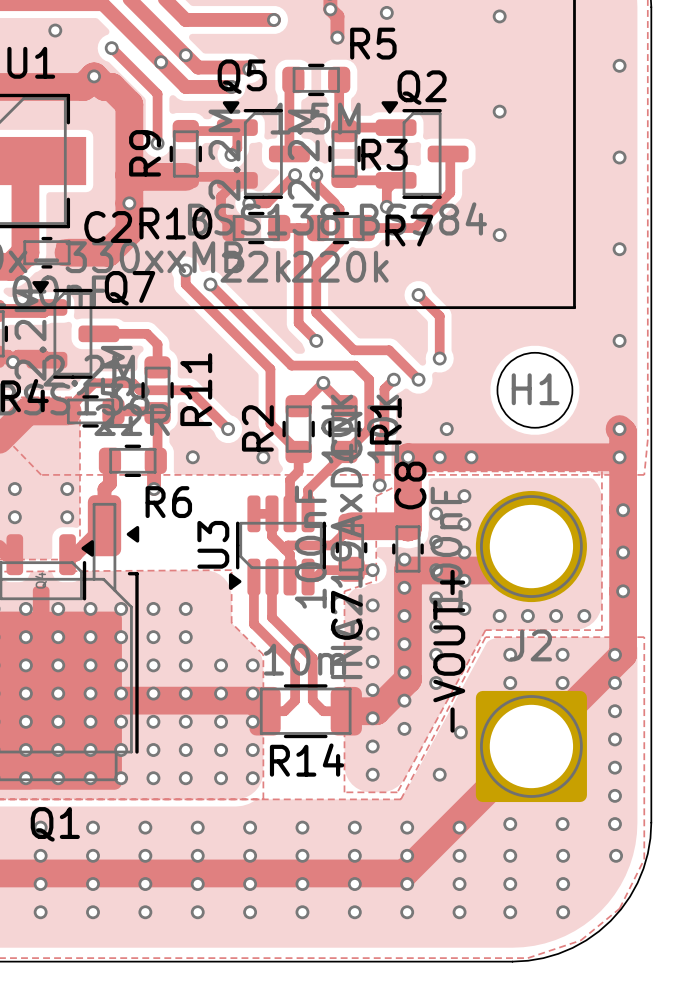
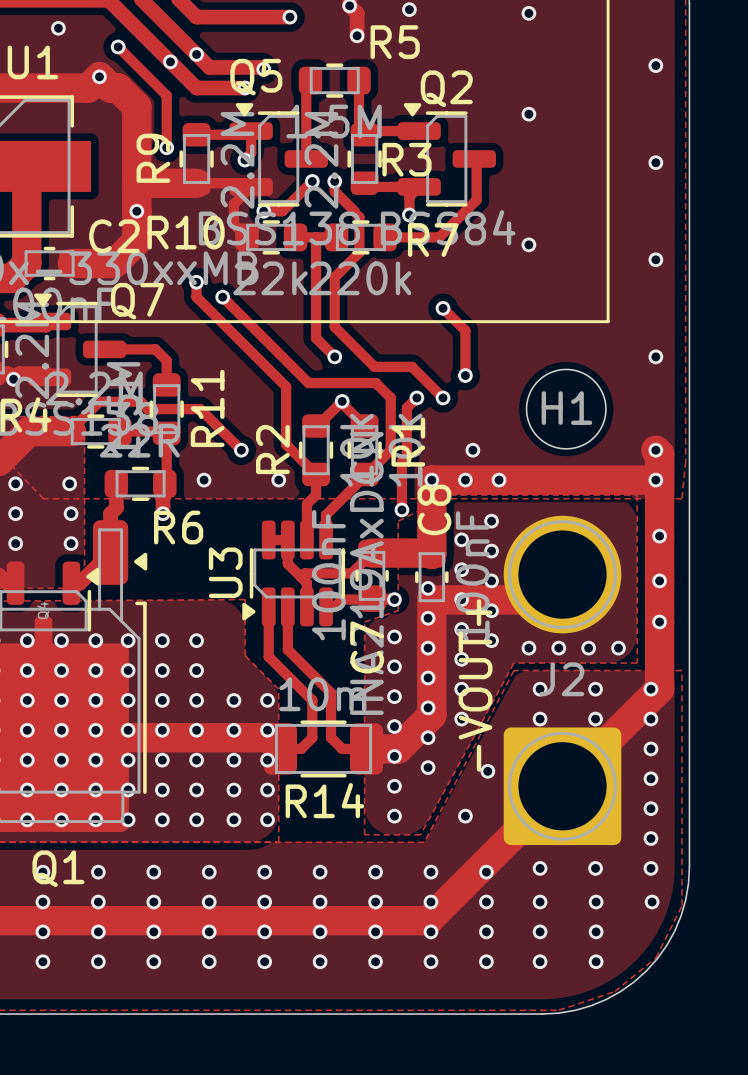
via: none -> (15, 483)
via: none -> (69, 483)

